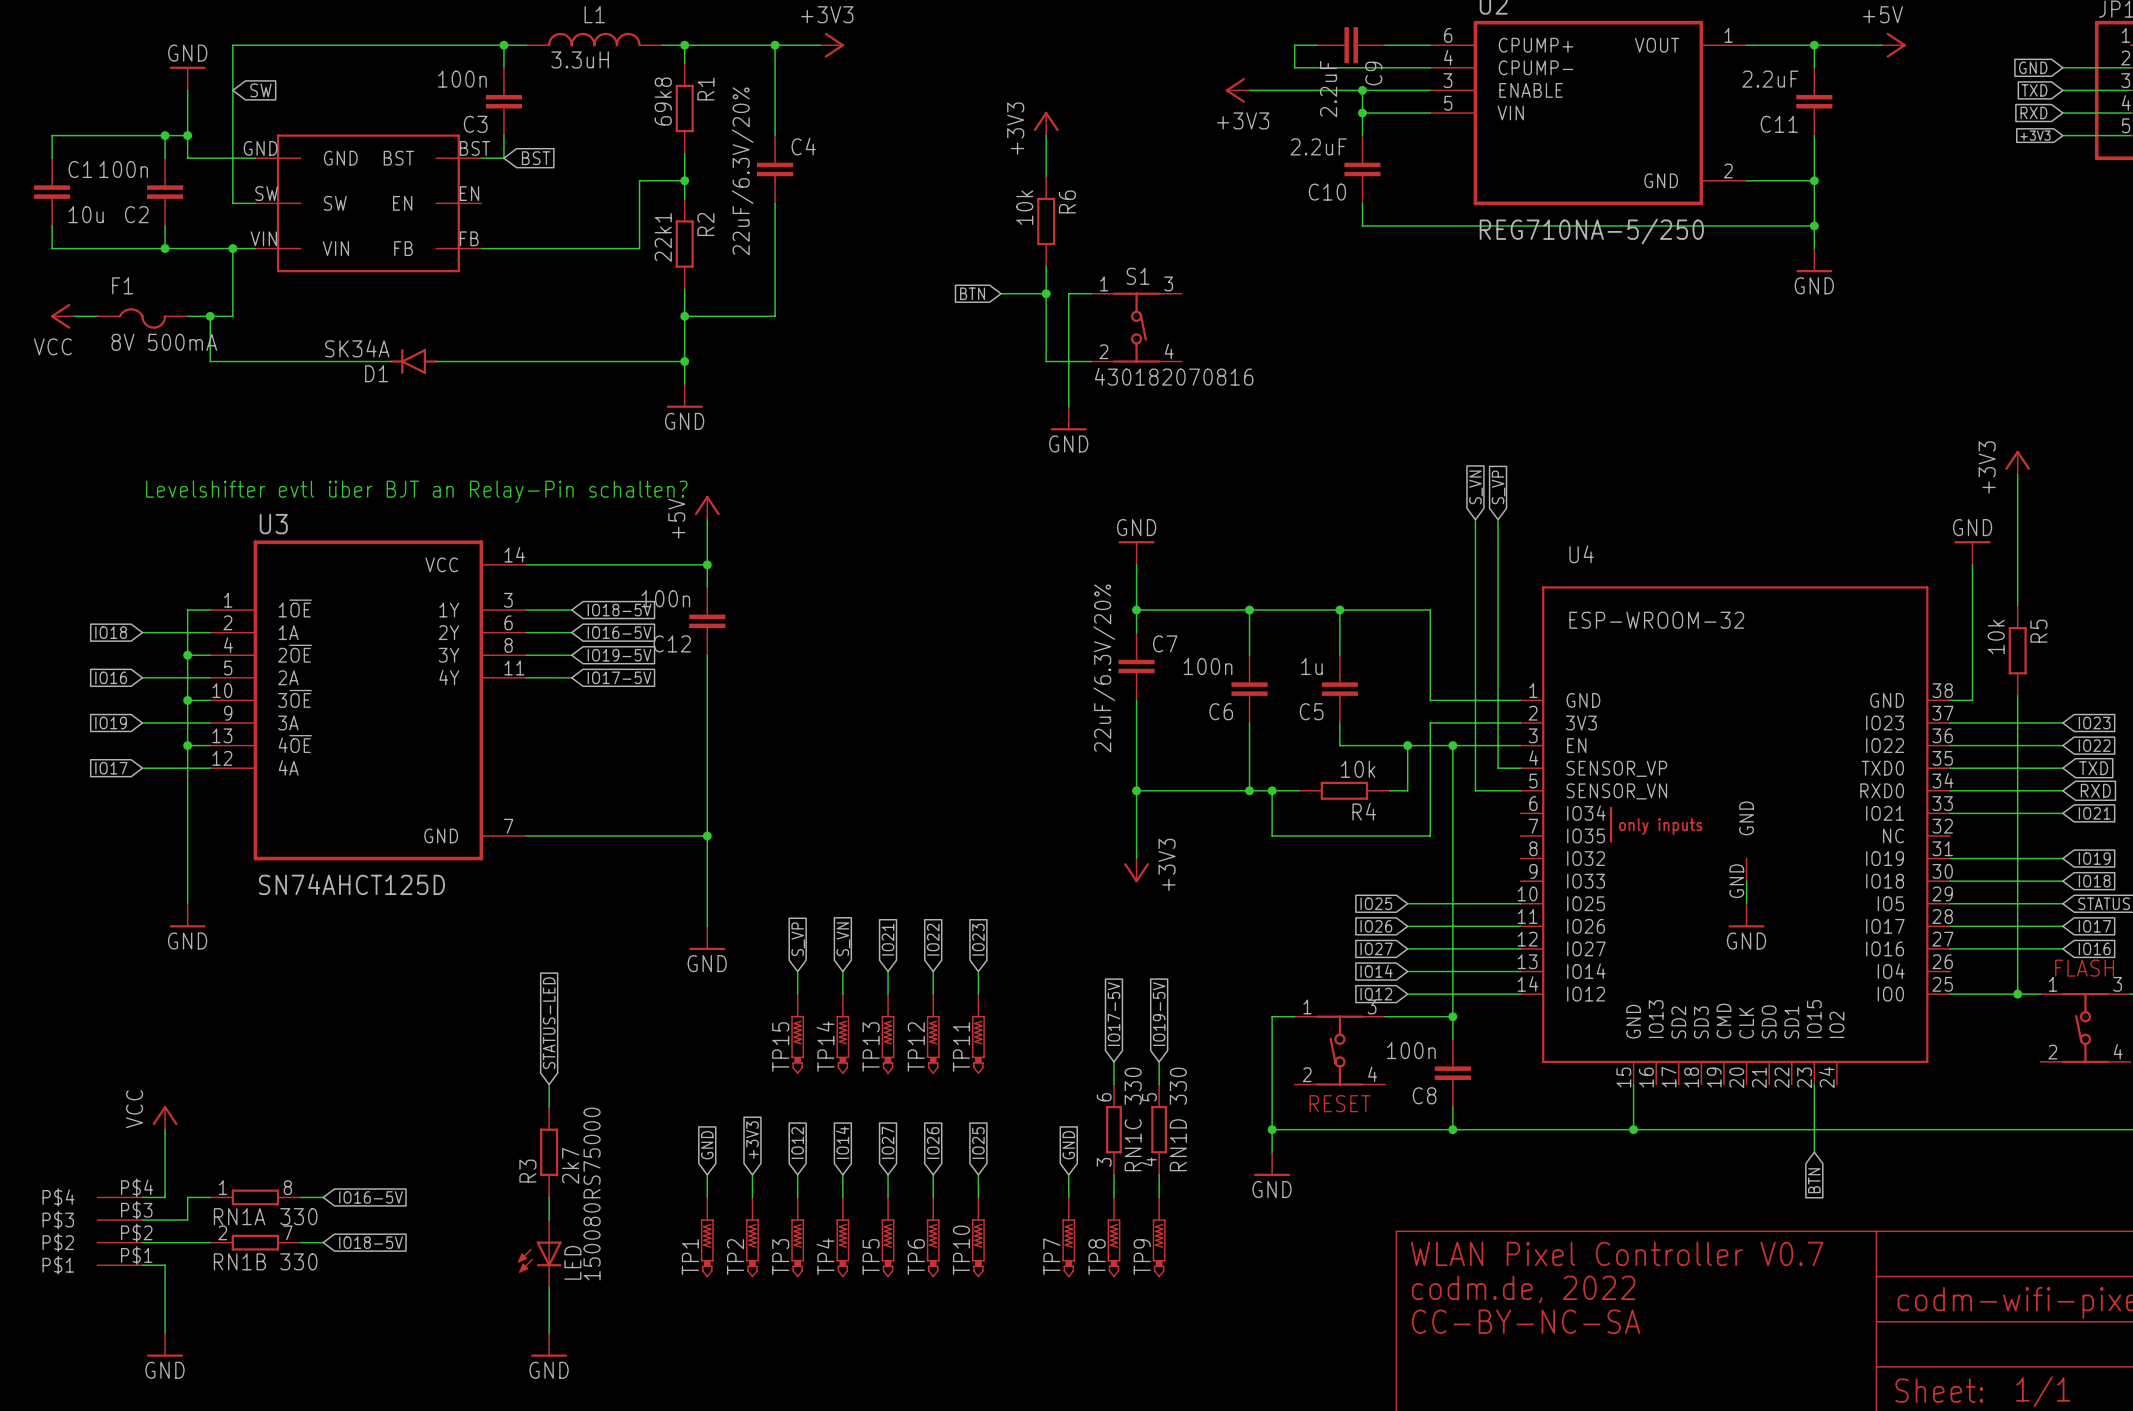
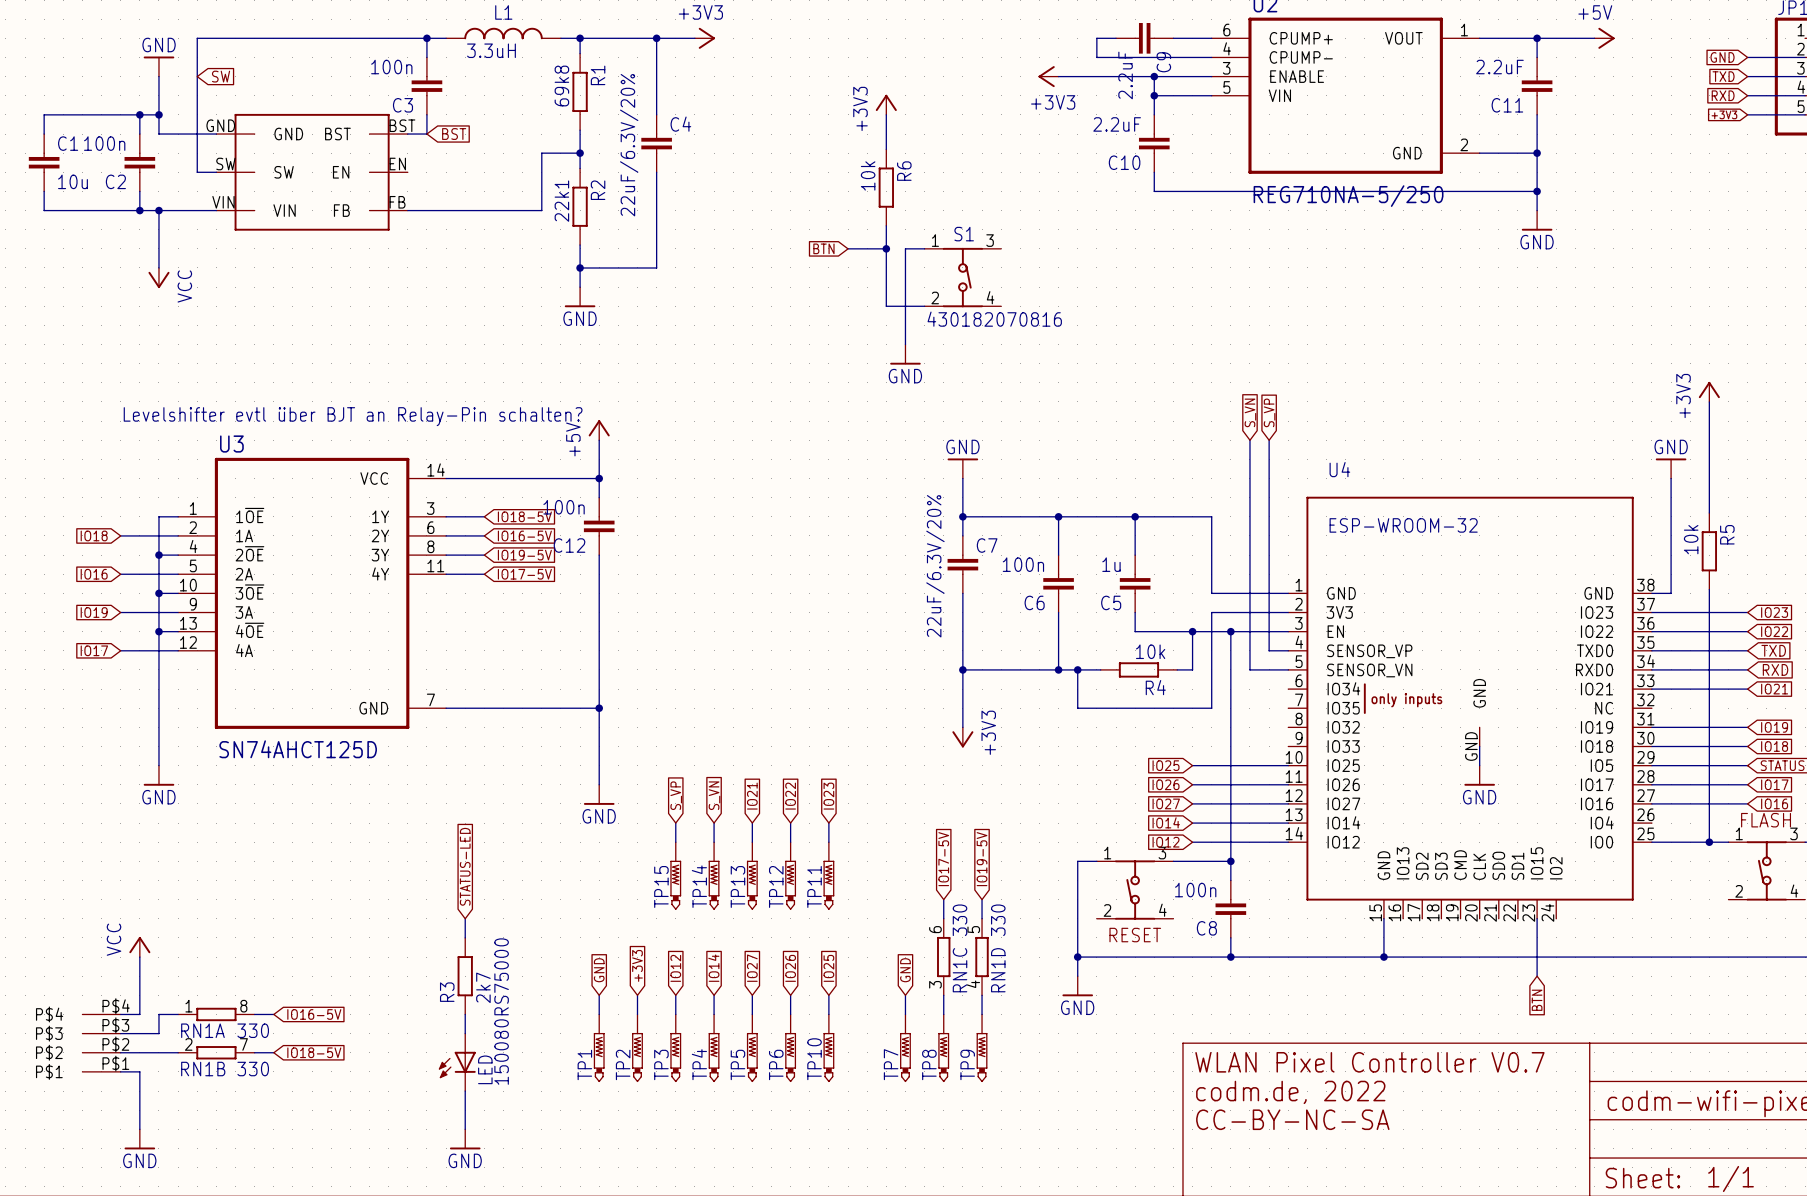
junction: none -> (158, 210)
wire: (232, 248) (232, 316) (187, 316) -> (158, 210) (158, 267)
junction: (232, 248) -> none
power symbol rotation: 0° (60, 316) -> 90° counterclockwise (158, 279)
power symbol position: VCC (62, 316) -> VCC (158, 278)
wire: (74, 316) (97, 316) -> none
wire: (210, 316) (210, 361) (391, 361) -> none
junction: (210, 316) -> none
F1: 8V 500mA (142, 318) -> none
D1: SK34A (413, 361) -> none
wire: (436, 361) (684, 361) -> none
junction: (684, 361) -> none
power symbol position: GND (684, 395) -> GND (580, 297)

